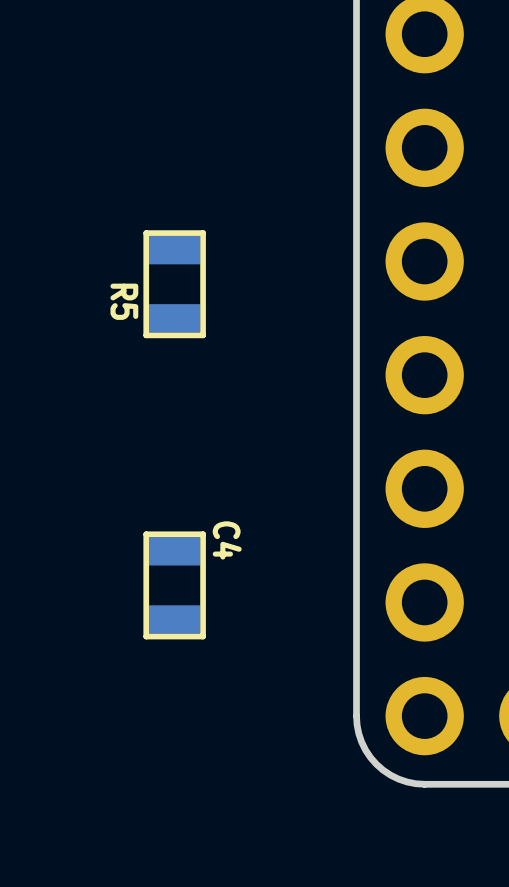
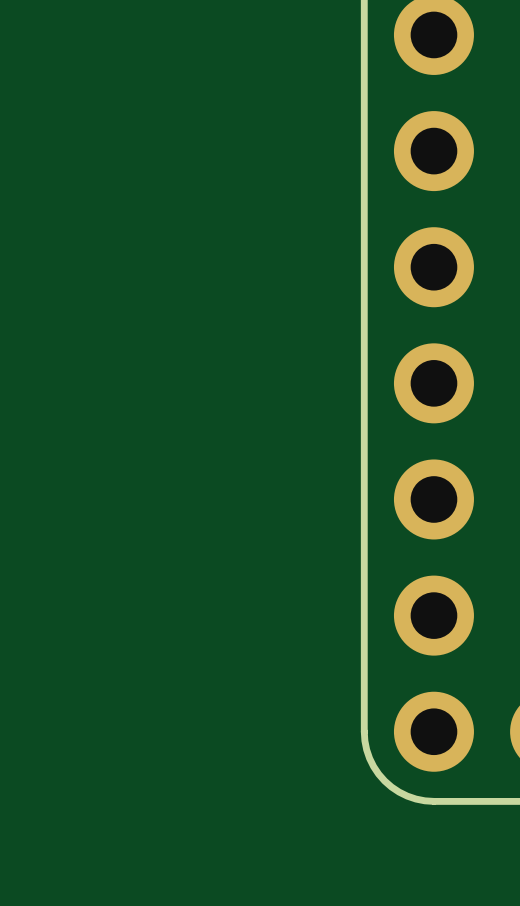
R5: (174, 284) -> none
C4: (174, 585) -> none

